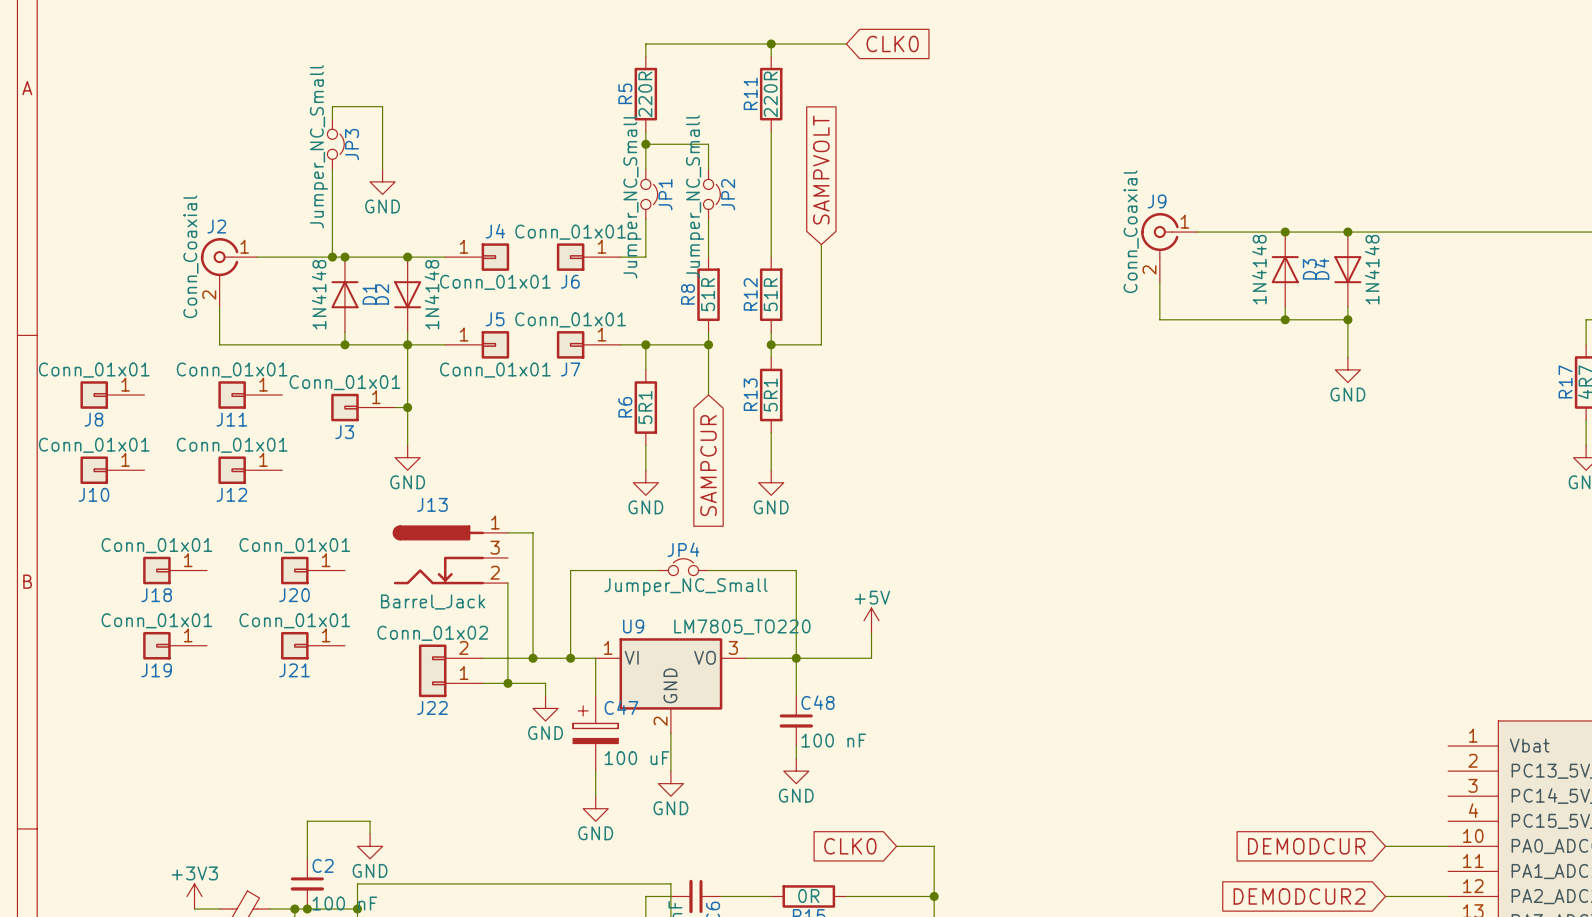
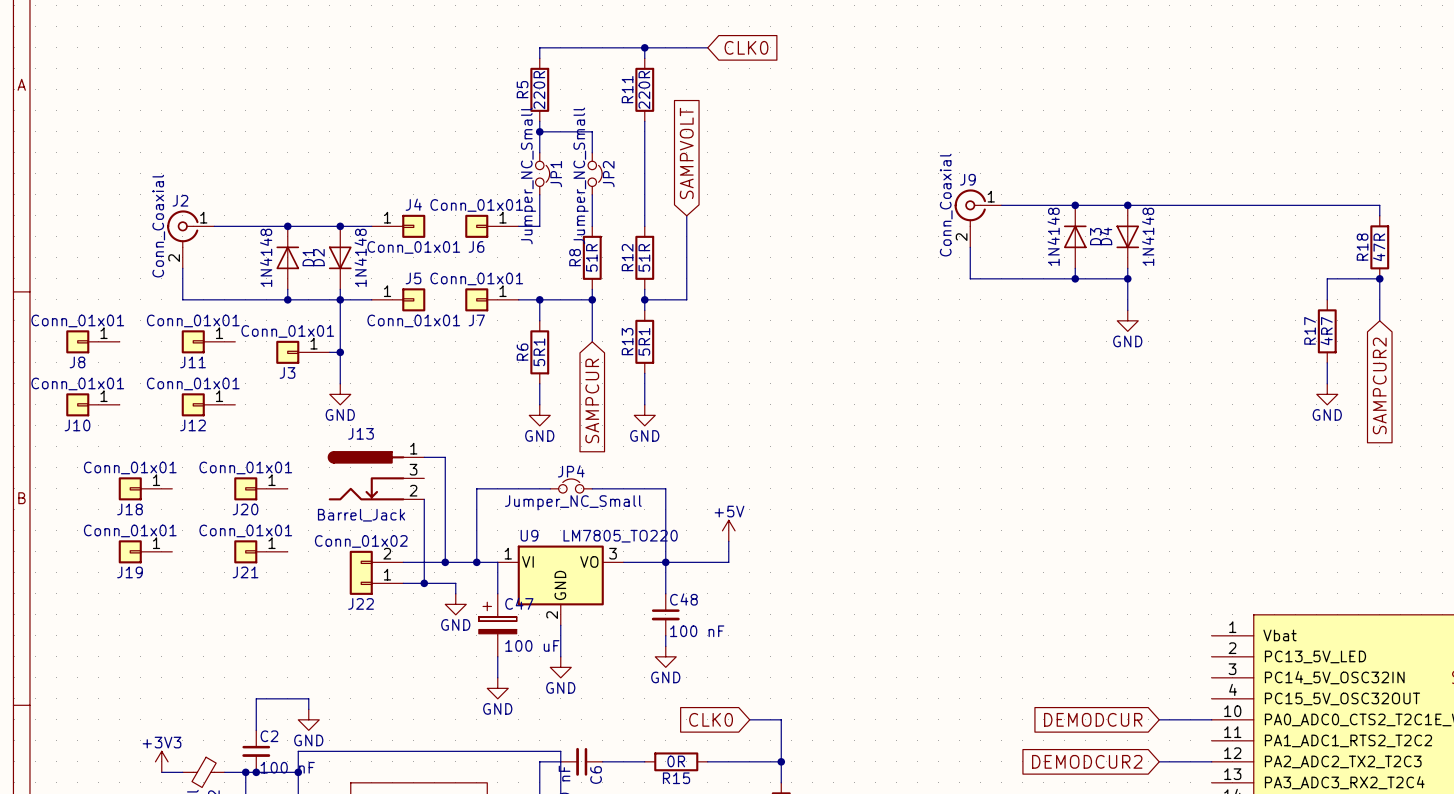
wire: (332, 119) (332, 106) (382, 106) (382, 169) -> none
JP3: Jumper_NC_Small (335, 144) -> none
wire: (332, 169) (332, 257) -> none
power symbol: GND (382, 181) -> none
junction: (332, 257) -> none

